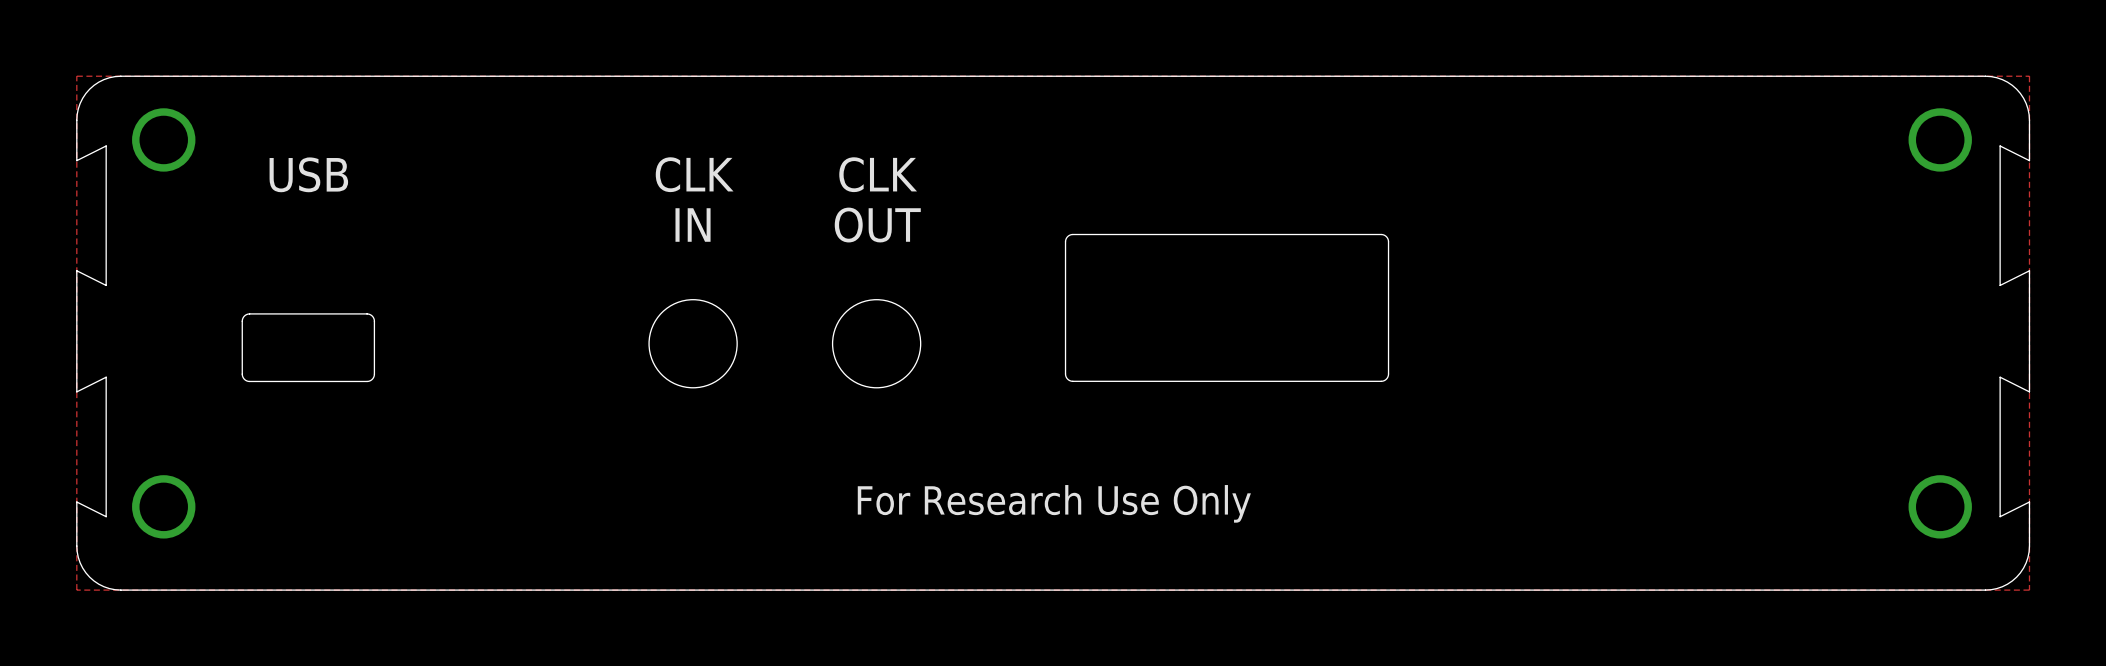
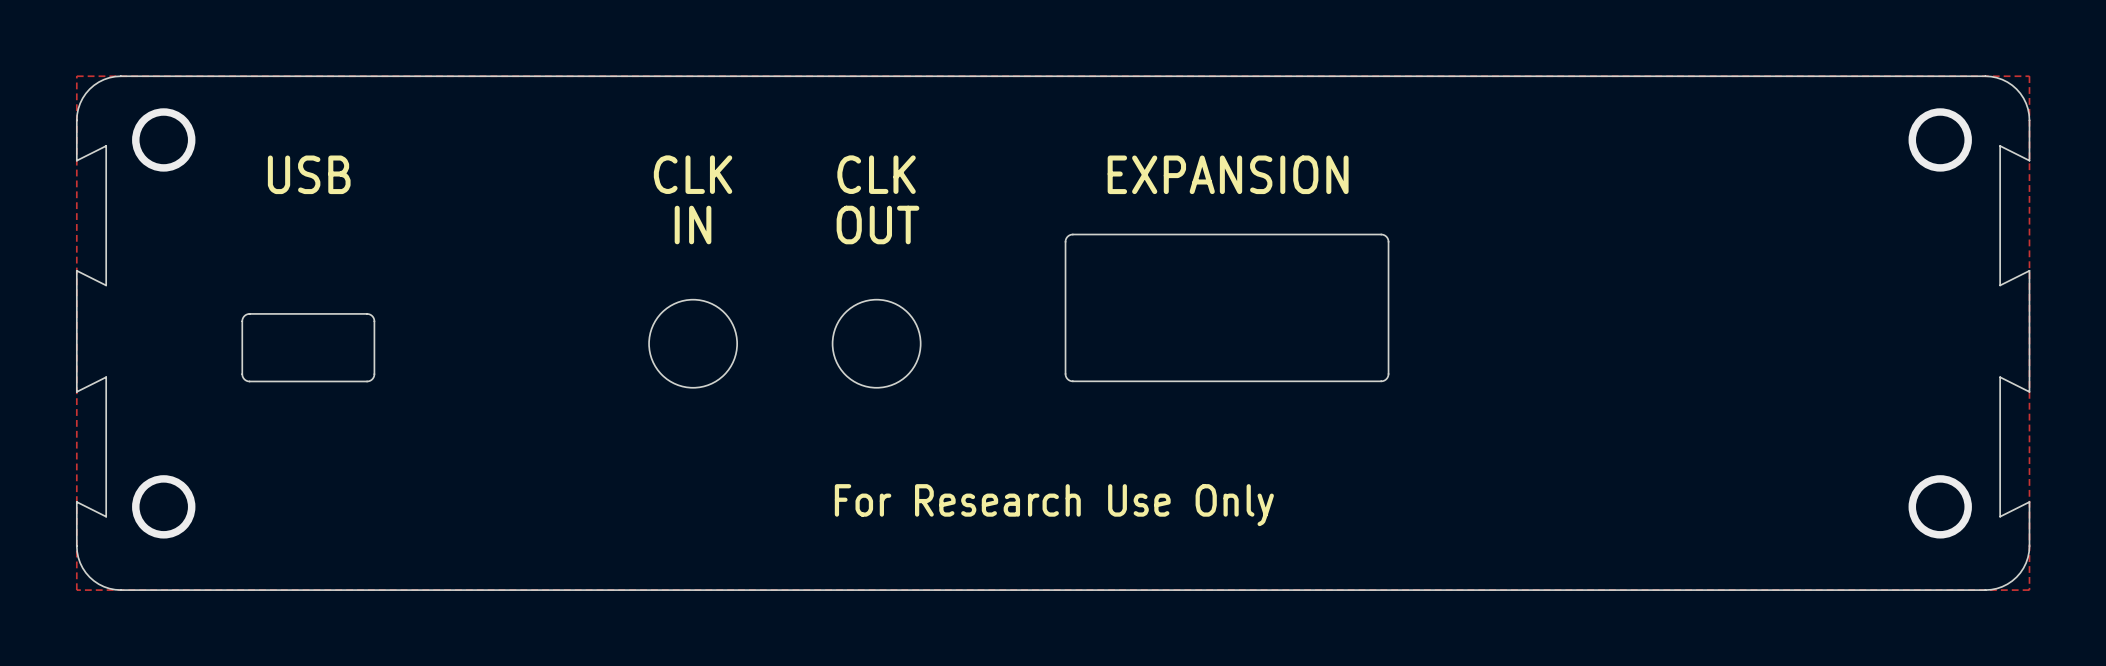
text: none -> EXPANSION (1228, 174)

